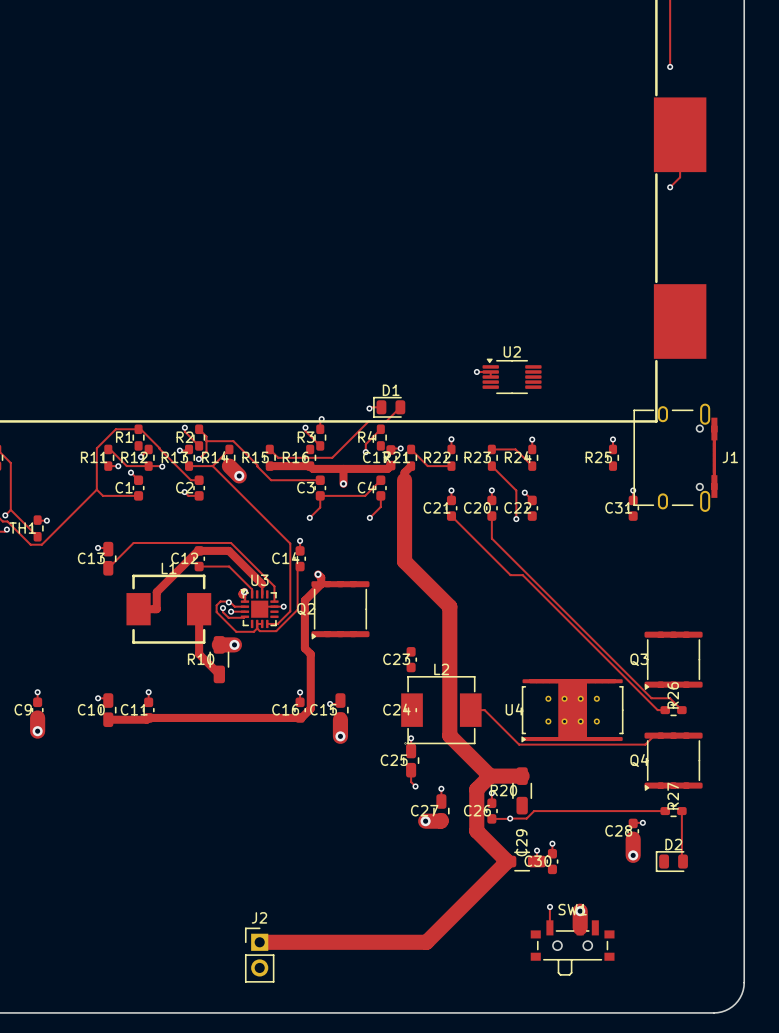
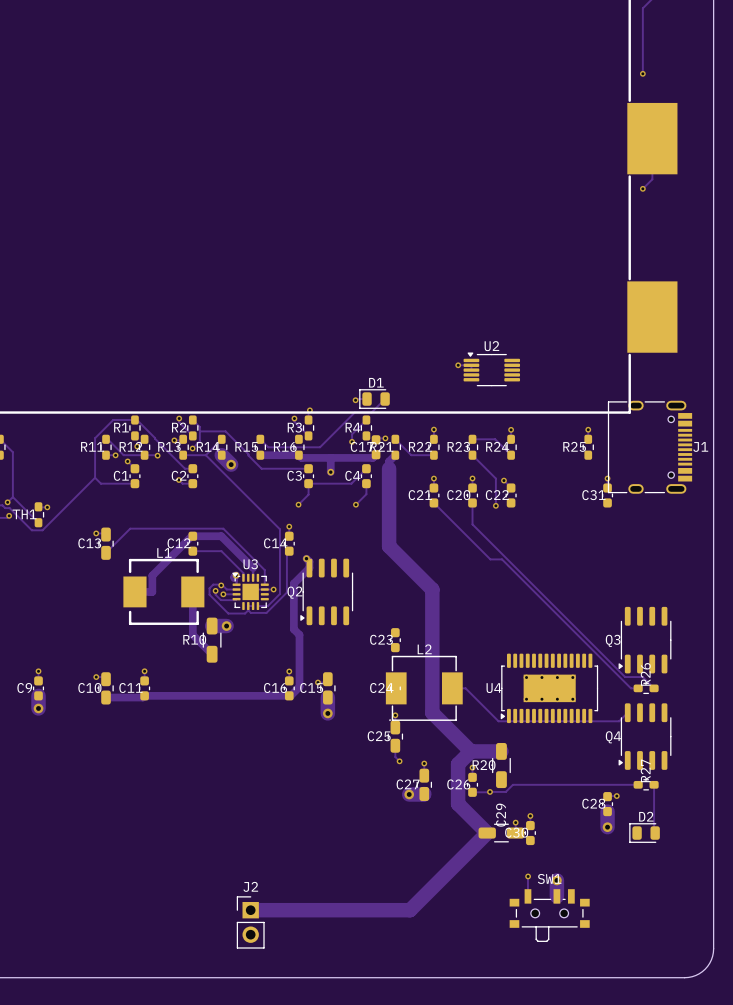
J1 footprint: [633, 403, 718, 512] -> [607, 400, 693, 494]
Q2 footprint: [311, 581, 370, 640] -> [300, 558, 354, 626]
Q3 footprint: [644, 631, 703, 690] -> [618, 606, 672, 674]
U4 footprint: [521, 679, 624, 743] -> [500, 653, 599, 724]
Q4 footprint: [644, 732, 703, 791] -> [618, 703, 672, 770]

